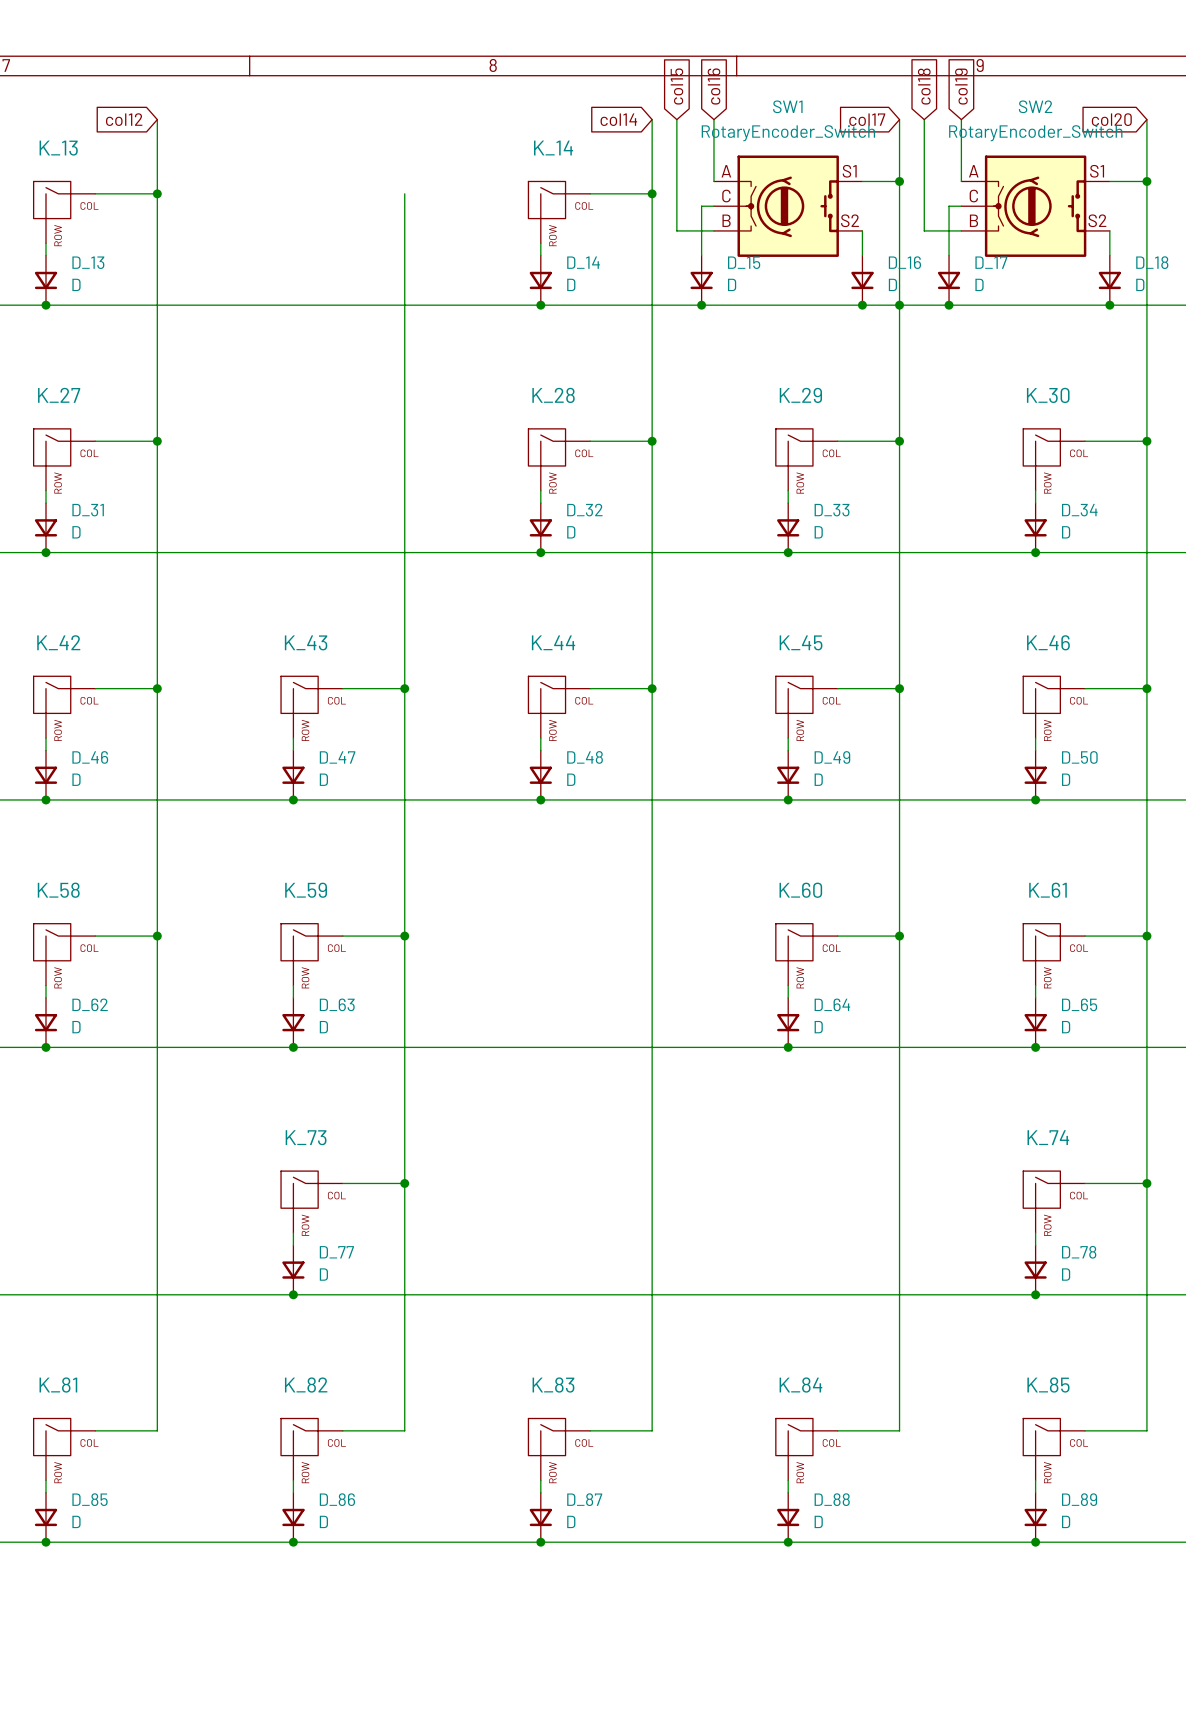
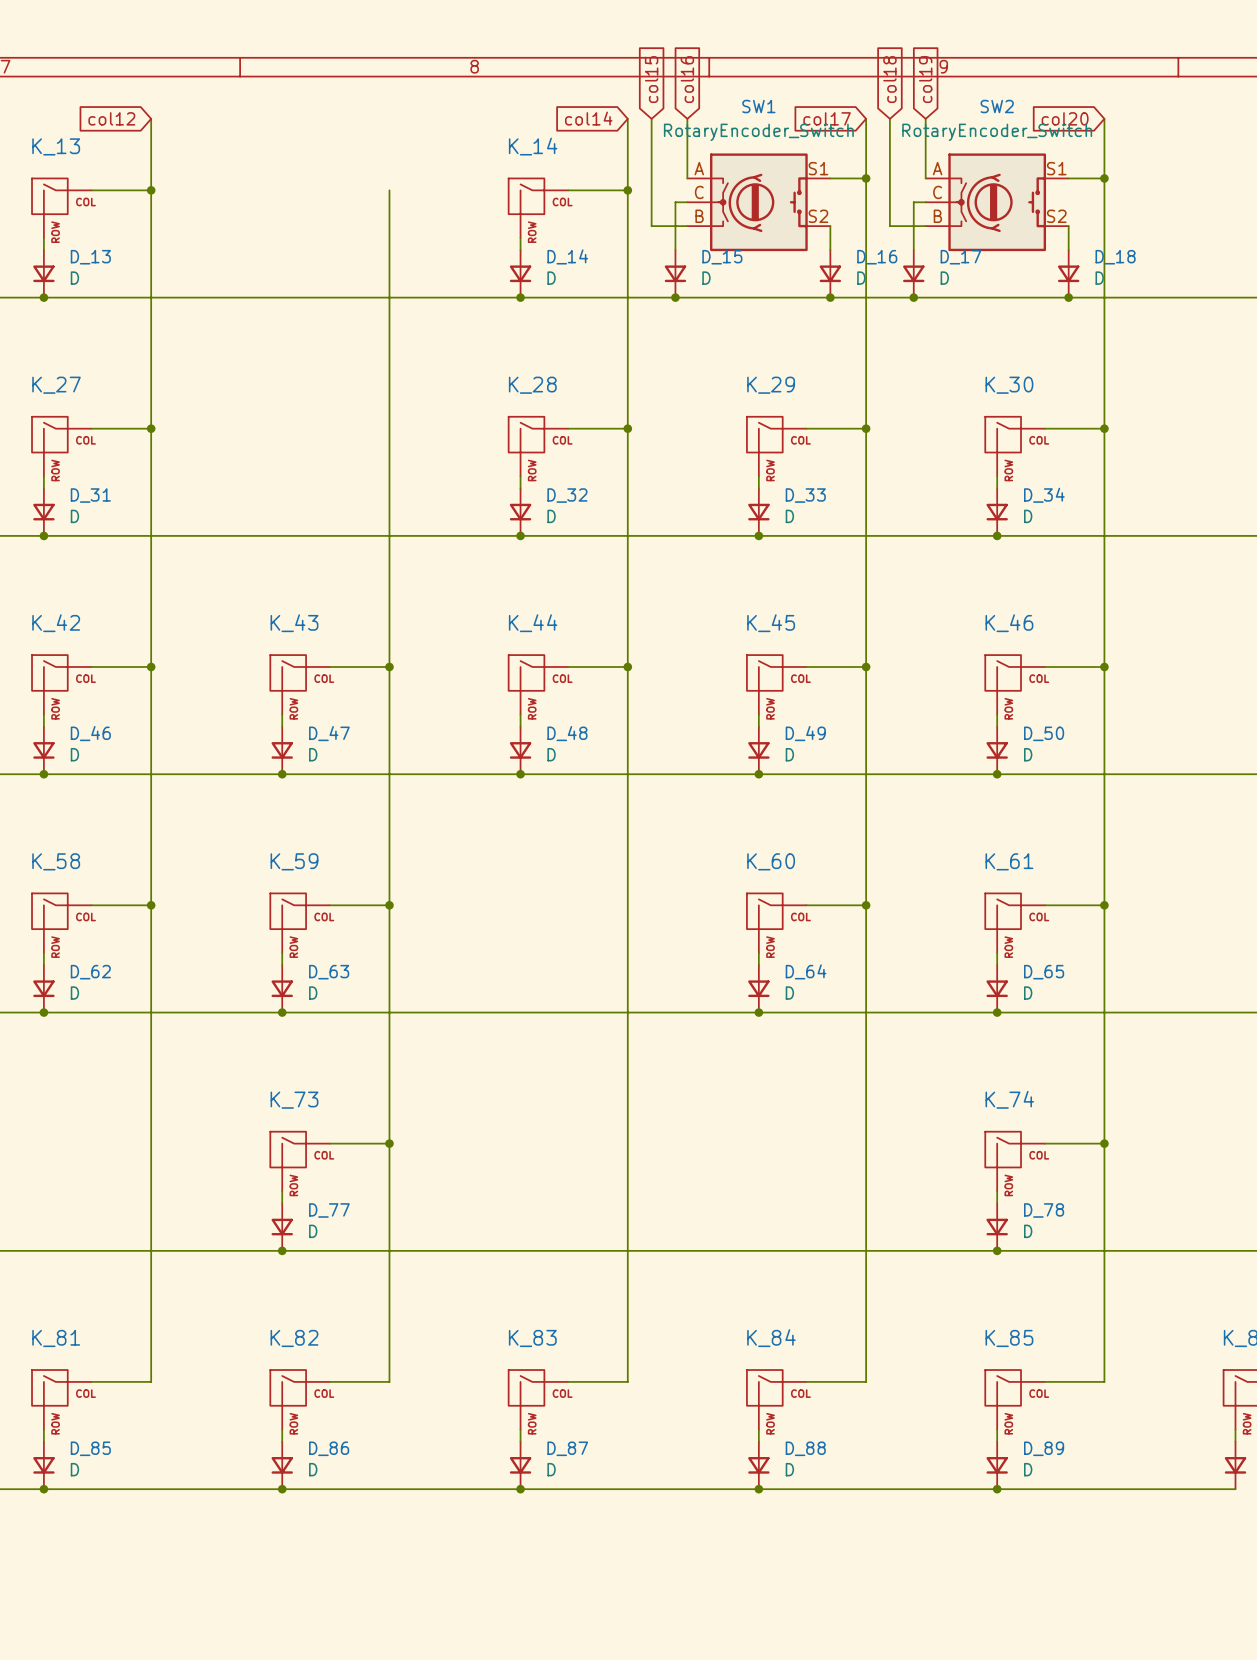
junction: (899, 305) -> none

